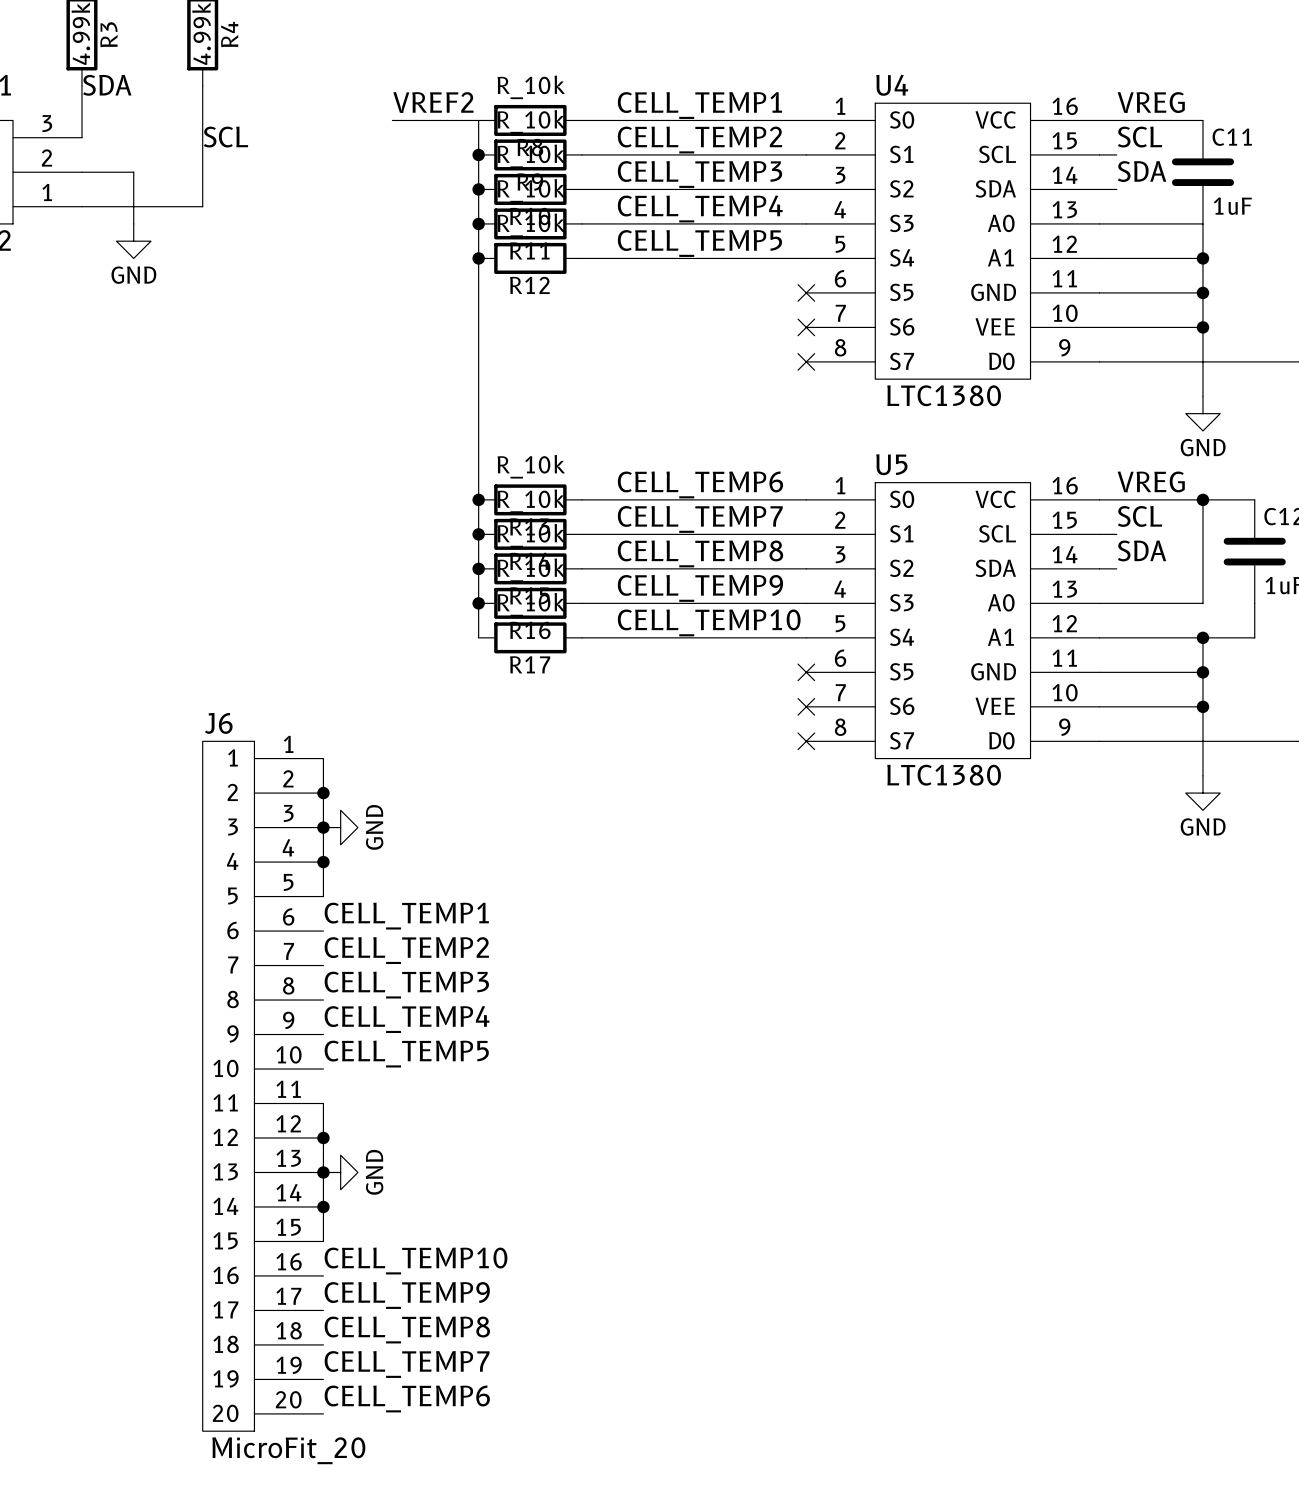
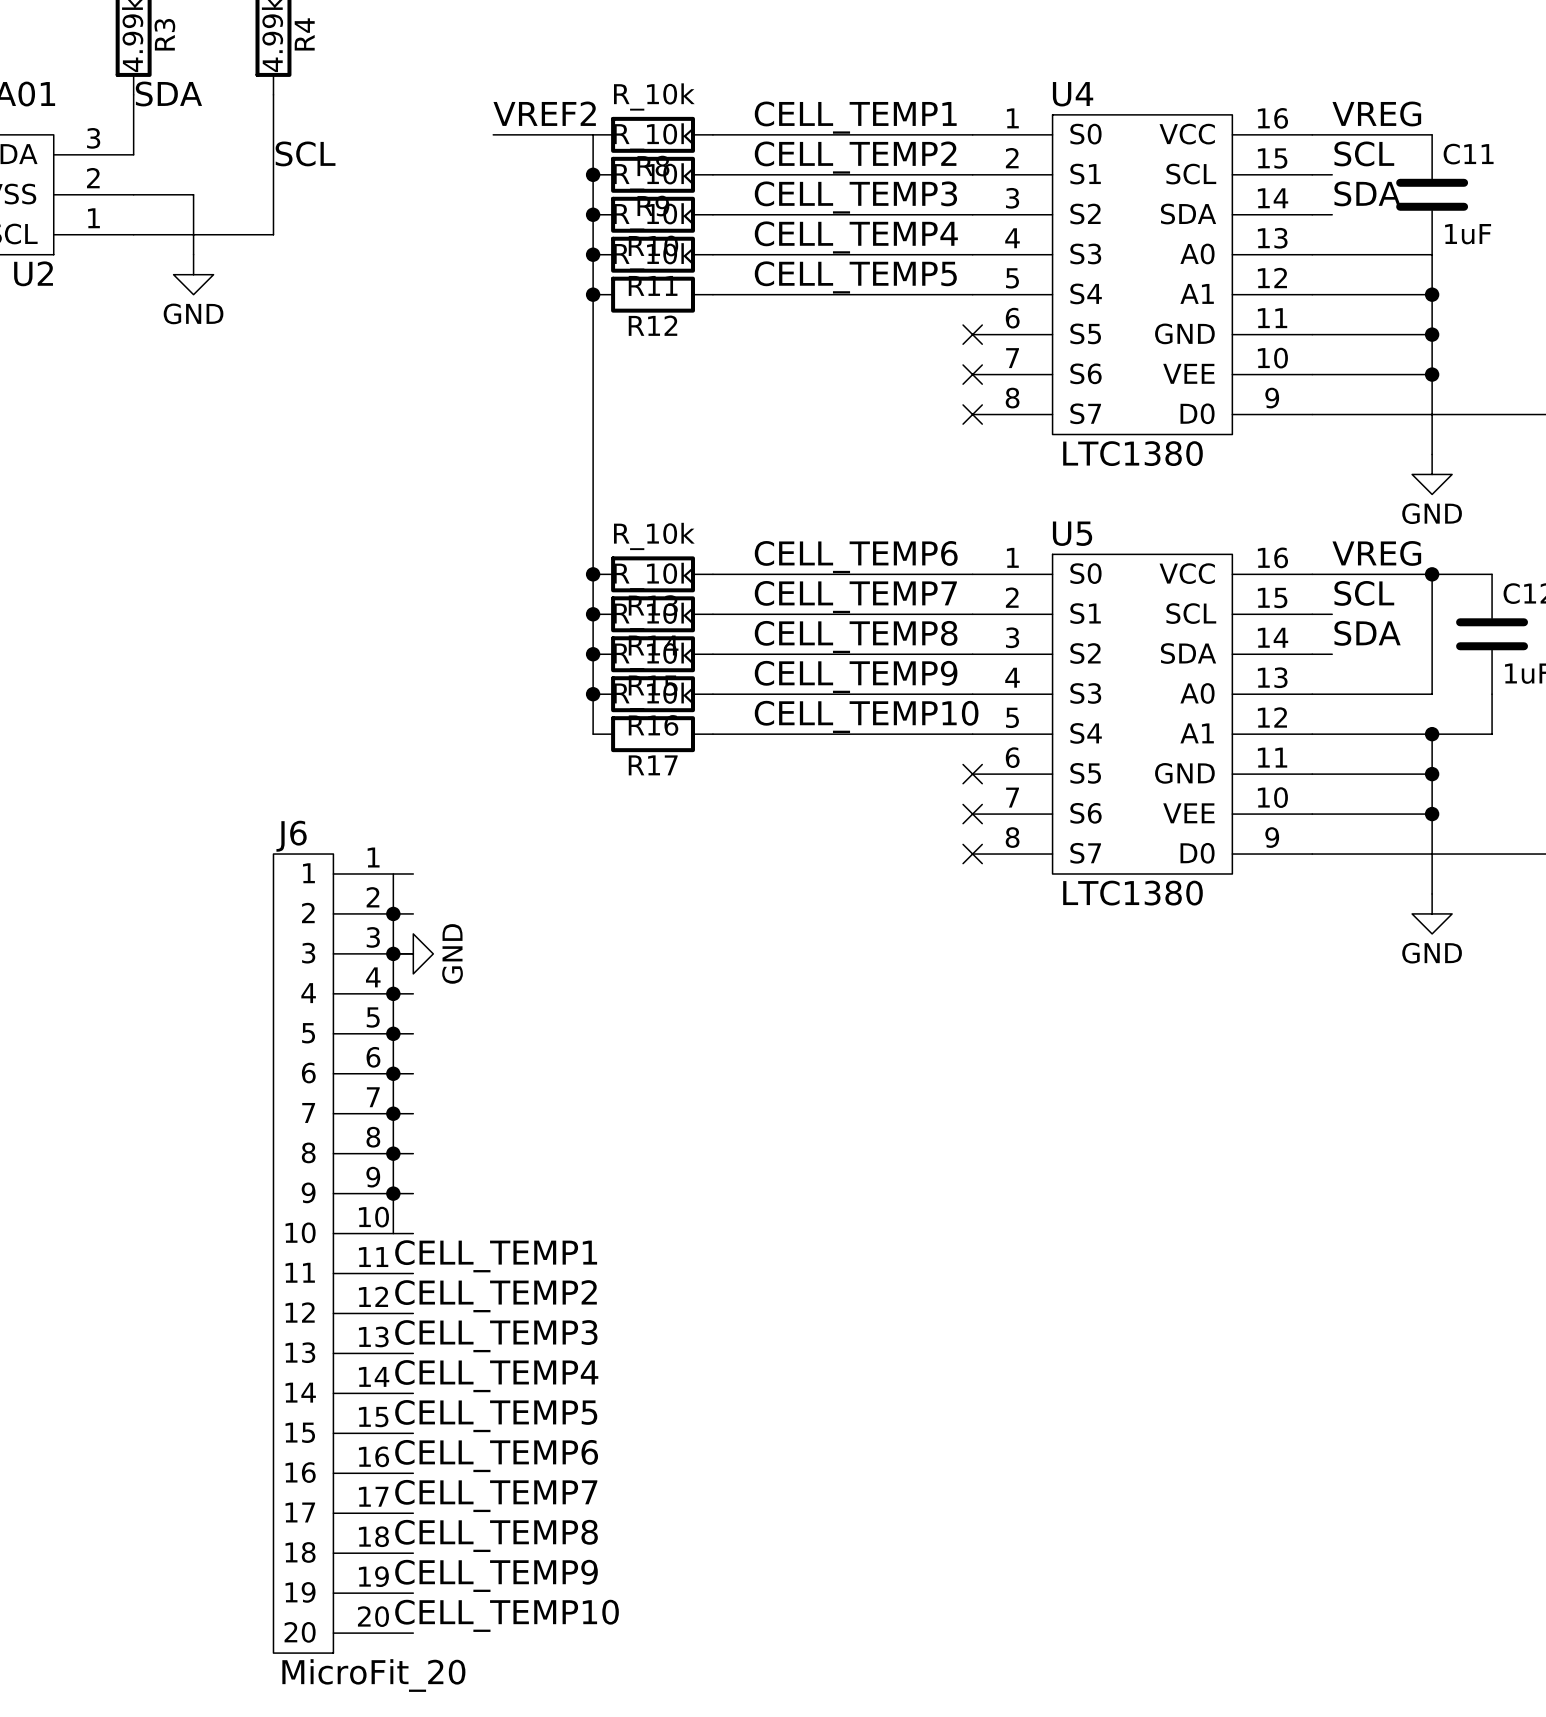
wire: none -> (393, 873) (393, 1233)
wire: (323, 758) (323, 896) -> none
junction position: (323, 793) -> (393, 913)
junction position: (323, 827) -> (393, 953)
power symbol position: GND (340, 827) -> GND (413, 953)
junction position: (323, 862) -> (393, 993)
junction: none -> (393, 1033)
label position: CELL_TEMP1 (406, 916) -> CELL_TEMP1 (496, 1256)
junction: none -> (393, 1073)
label position: CELL_TEMP2 (406, 950) -> CELL_TEMP2 (496, 1296)
junction: none -> (393, 1113)
label position: CELL_TEMP3 (406, 985) -> CELL_TEMP3 (496, 1336)
junction: none -> (393, 1153)
label position: CELL_TEMP4 (407, 1019) -> CELL_TEMP4 (496, 1376)
junction: none -> (393, 1193)
label position: CELL_TEMP5 (406, 1054) -> CELL_TEMP5 (496, 1416)
wire: (323, 1103) (323, 1241) -> none
junction: (323, 1137) -> none
junction: (323, 1172) -> none
power symbol: GND (340, 1172) -> none
junction: (323, 1206) -> none
label position: CELL_TEMP10 (416, 1261) -> CELL_TEMP10 (507, 1615)
label position: CELL_TEMP9 (407, 1295) -> CELL_TEMP9 (496, 1575)
label position: CELL_TEMP8 (407, 1329) -> CELL_TEMP8 (496, 1535)
label position: CELL_TEMP7 (407, 1364) -> CELL_TEMP7 (496, 1495)
label position: CELL_TEMP6 (407, 1398) -> CELL_TEMP6 (496, 1456)

